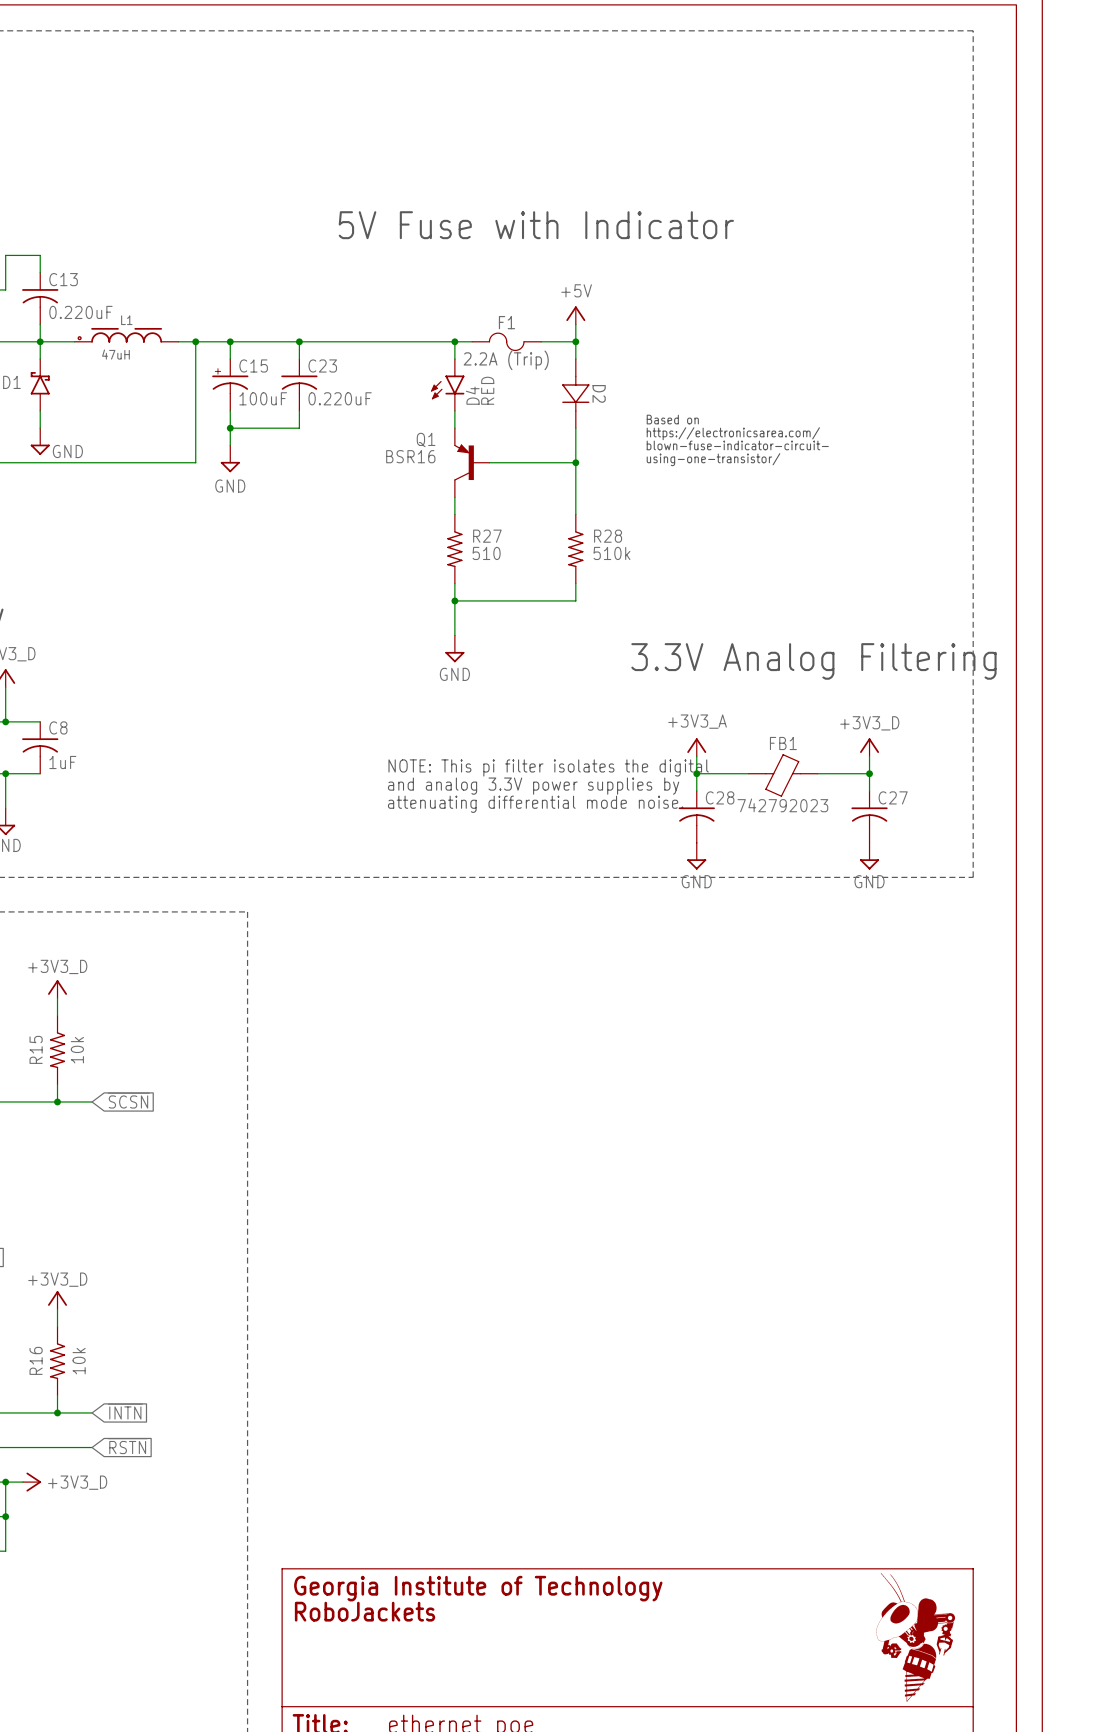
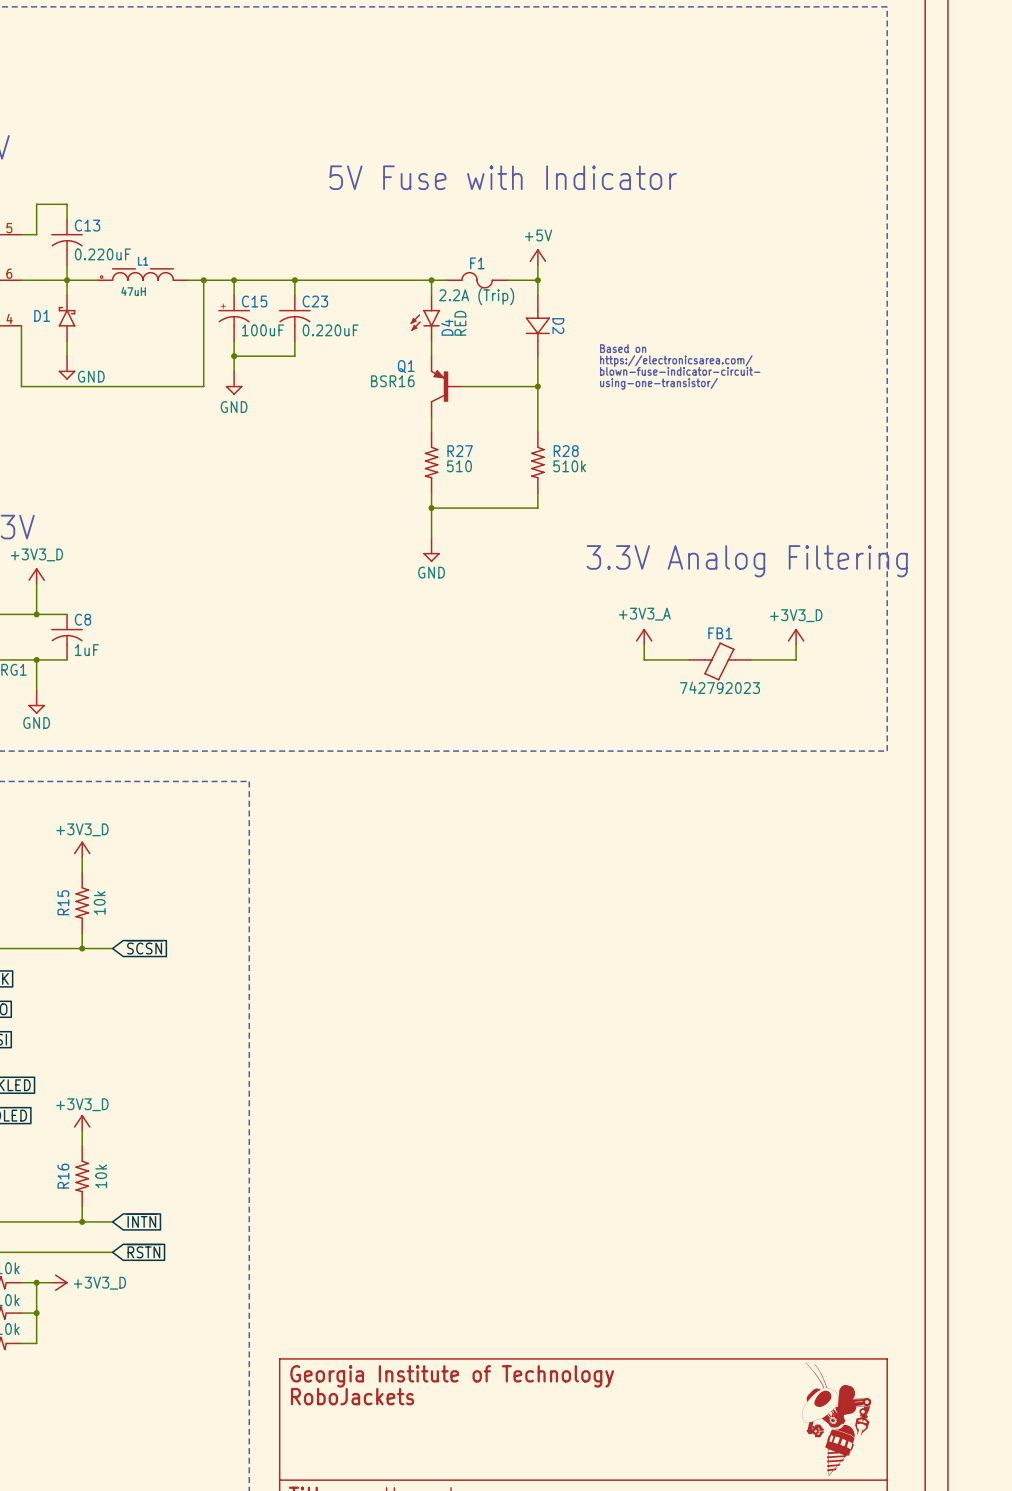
text: NOTE: This pi filter isolates the digital (548, 767) -> none
wire: (696, 773) (696, 791) -> none
junction: (696, 773) -> none
wire: (869, 773) (869, 791) -> none
junction: (869, 773) -> none
text: and analog 3.3V power supplies by (533, 786) -> none
text: attenuating differential mode noise. (535, 804) -> none
C28: (696, 816) -> none
C27: (869, 816) -> none
power symbol: GND (696, 856) -> none
power symbol: GND (869, 856) -> none

